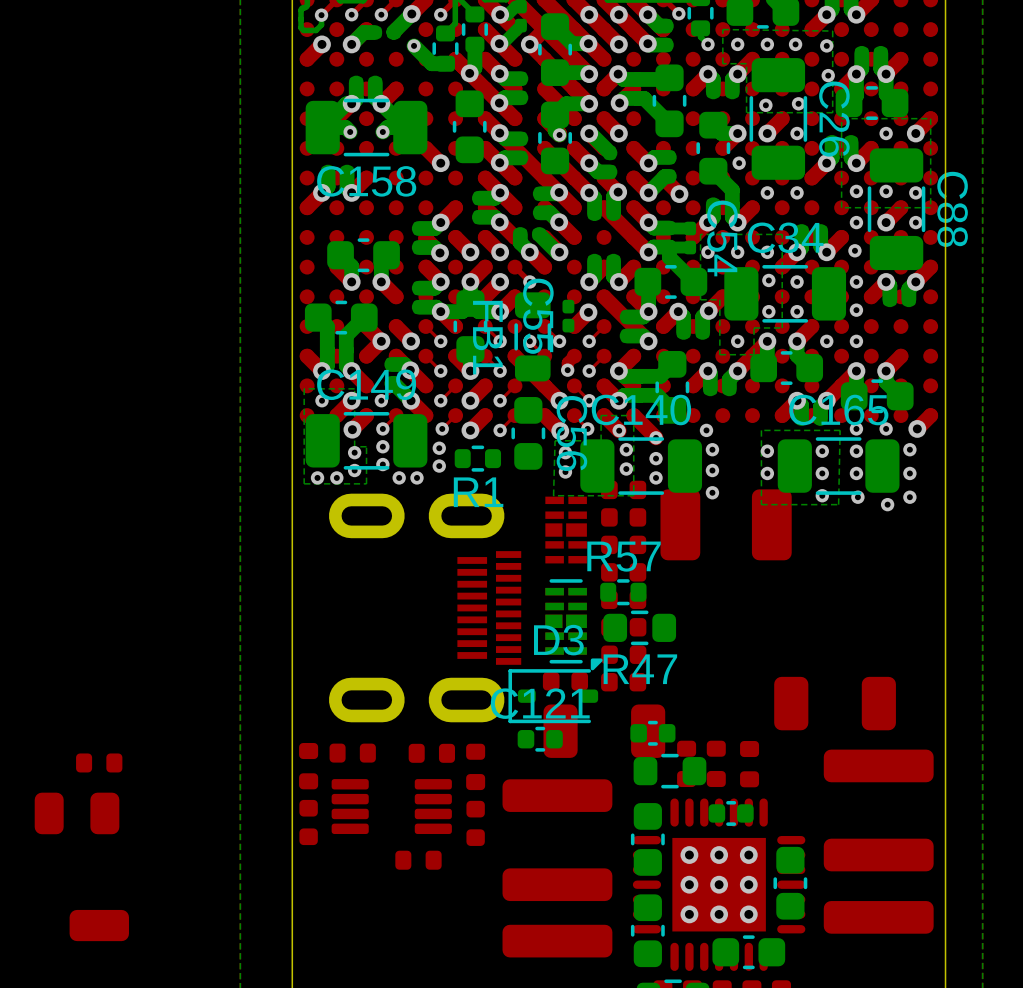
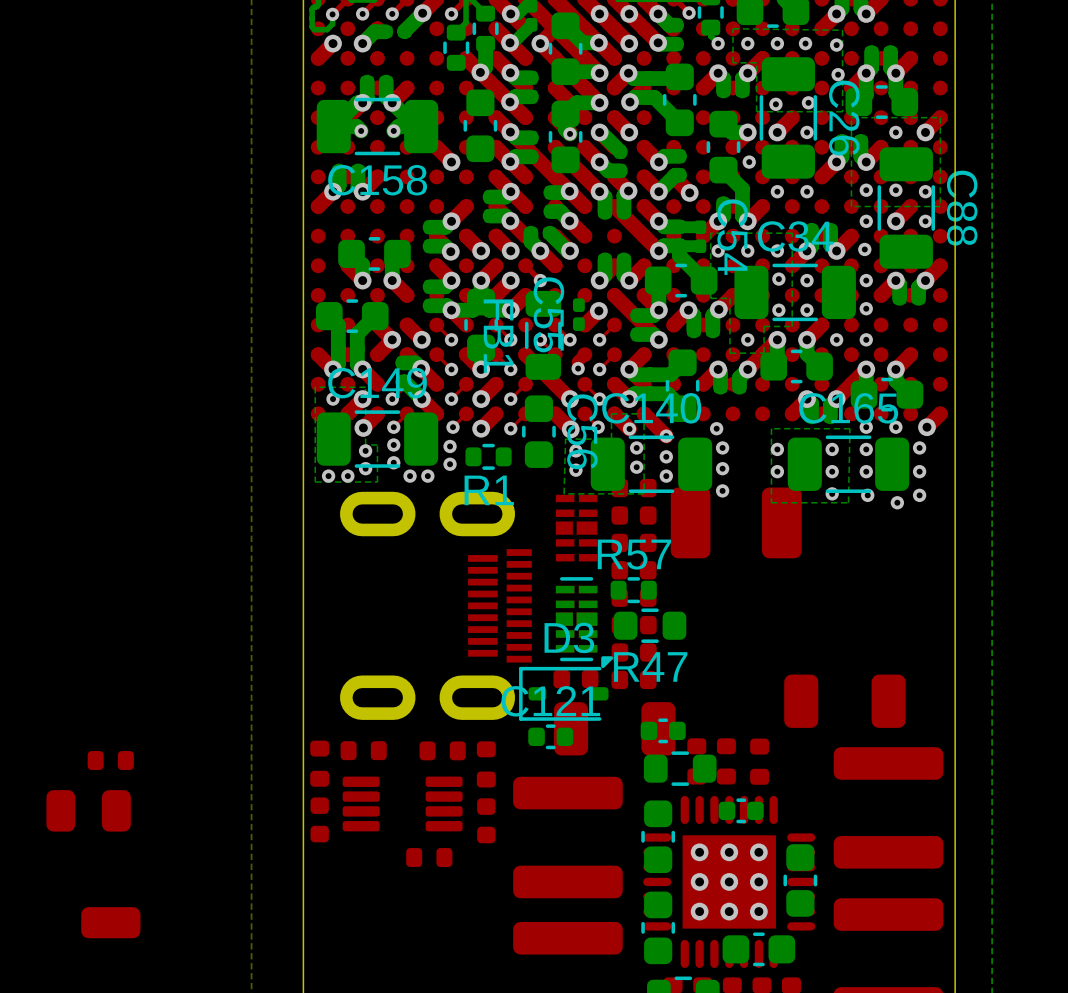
bottom track: (414, 45) (431, 63) (445, 63) -> none
via: (414, 45) -> none

